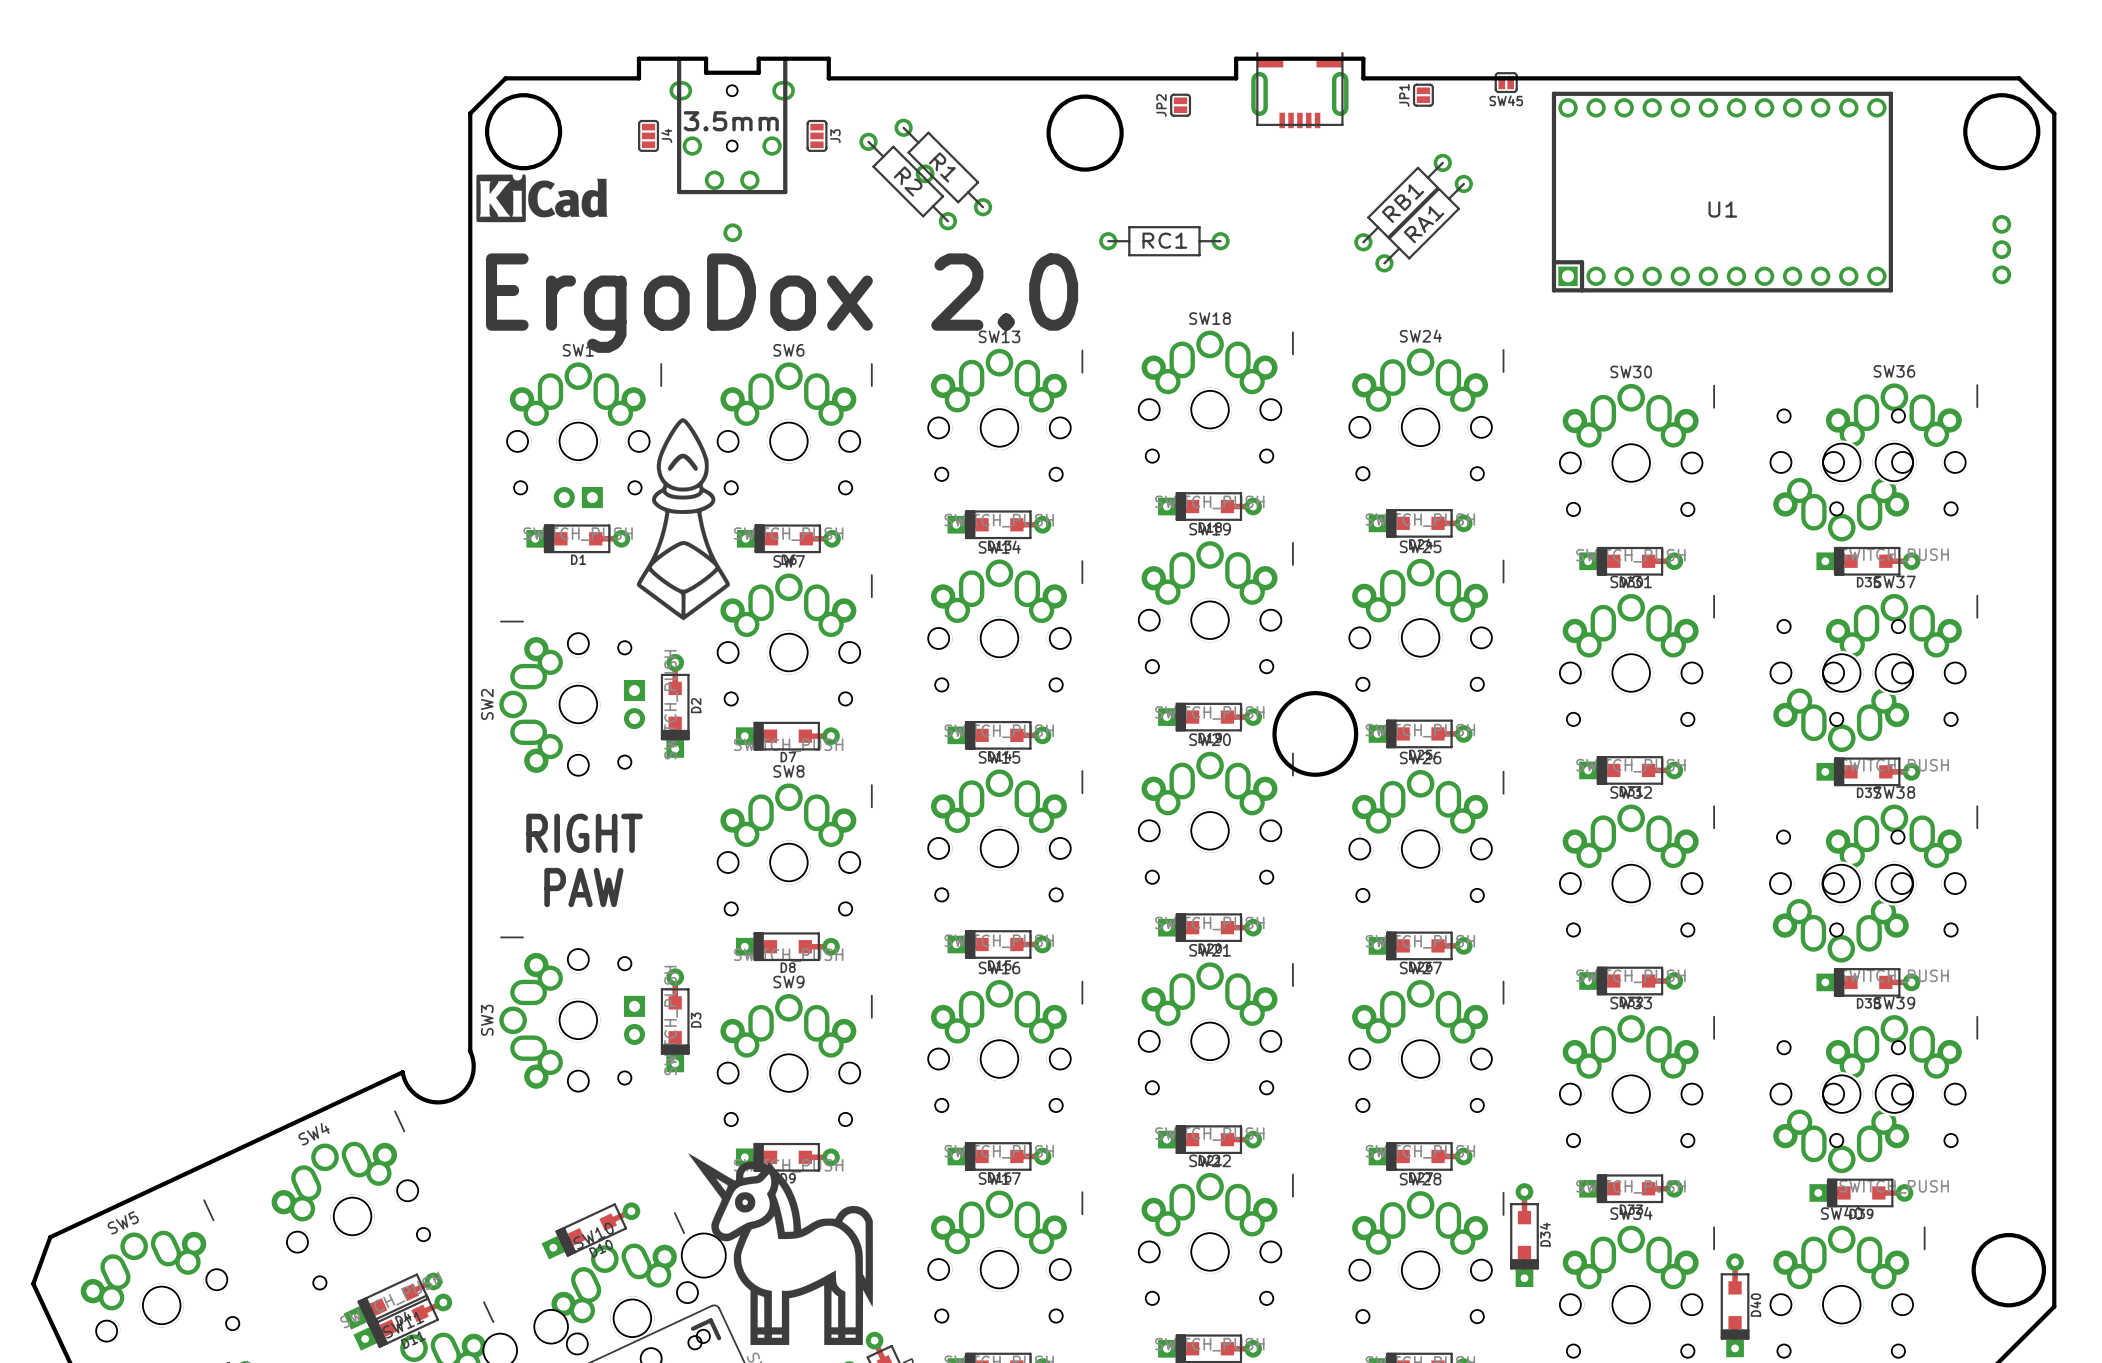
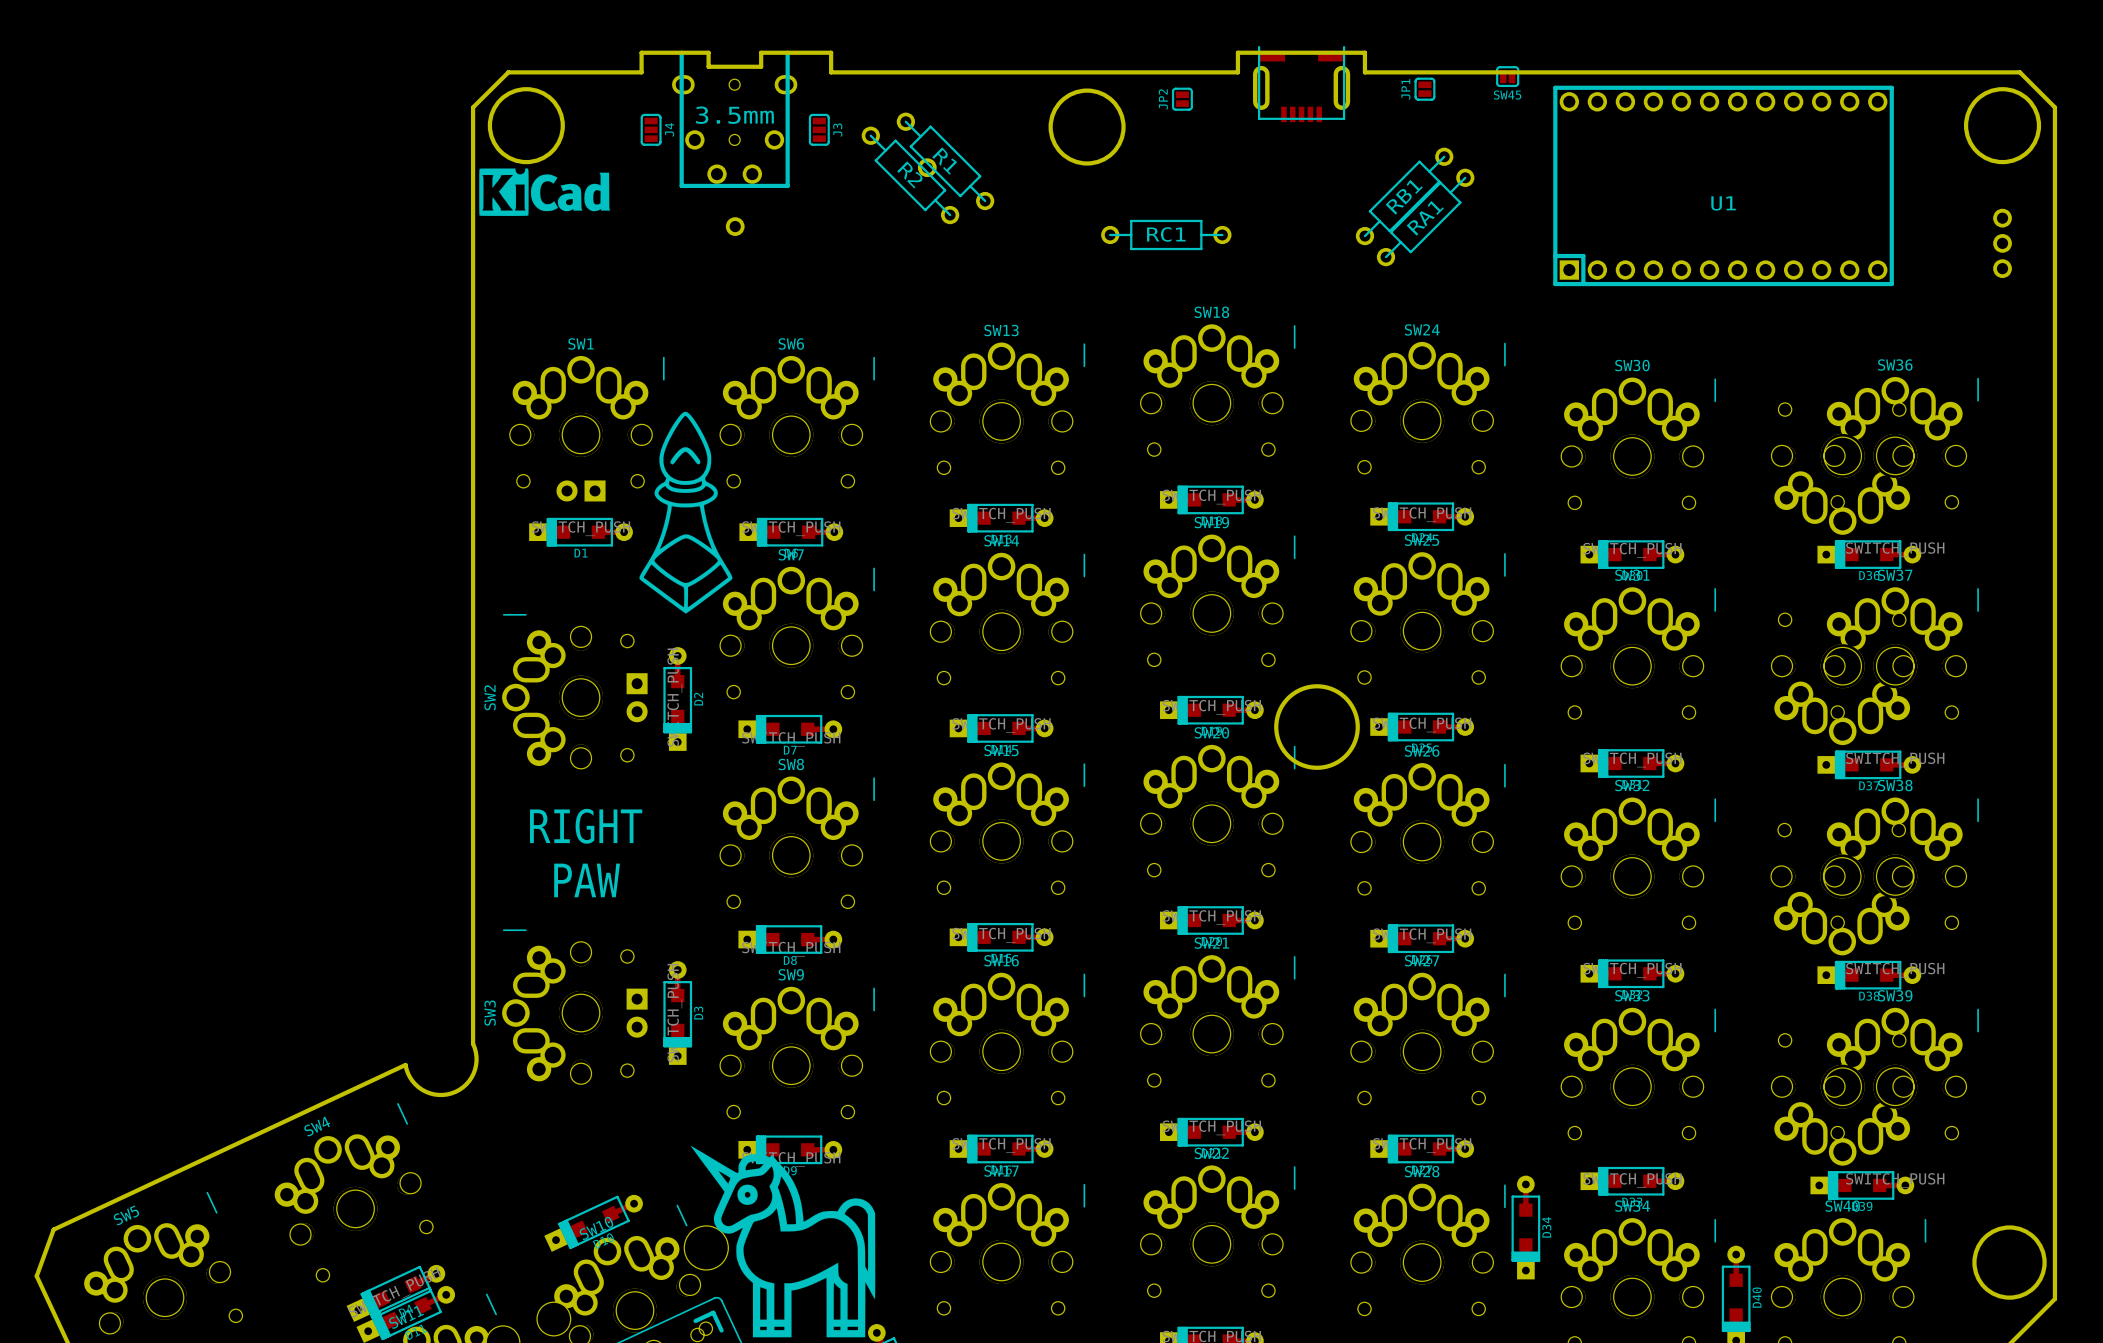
text: ErgoDox 2.0 (782, 303) -> none

